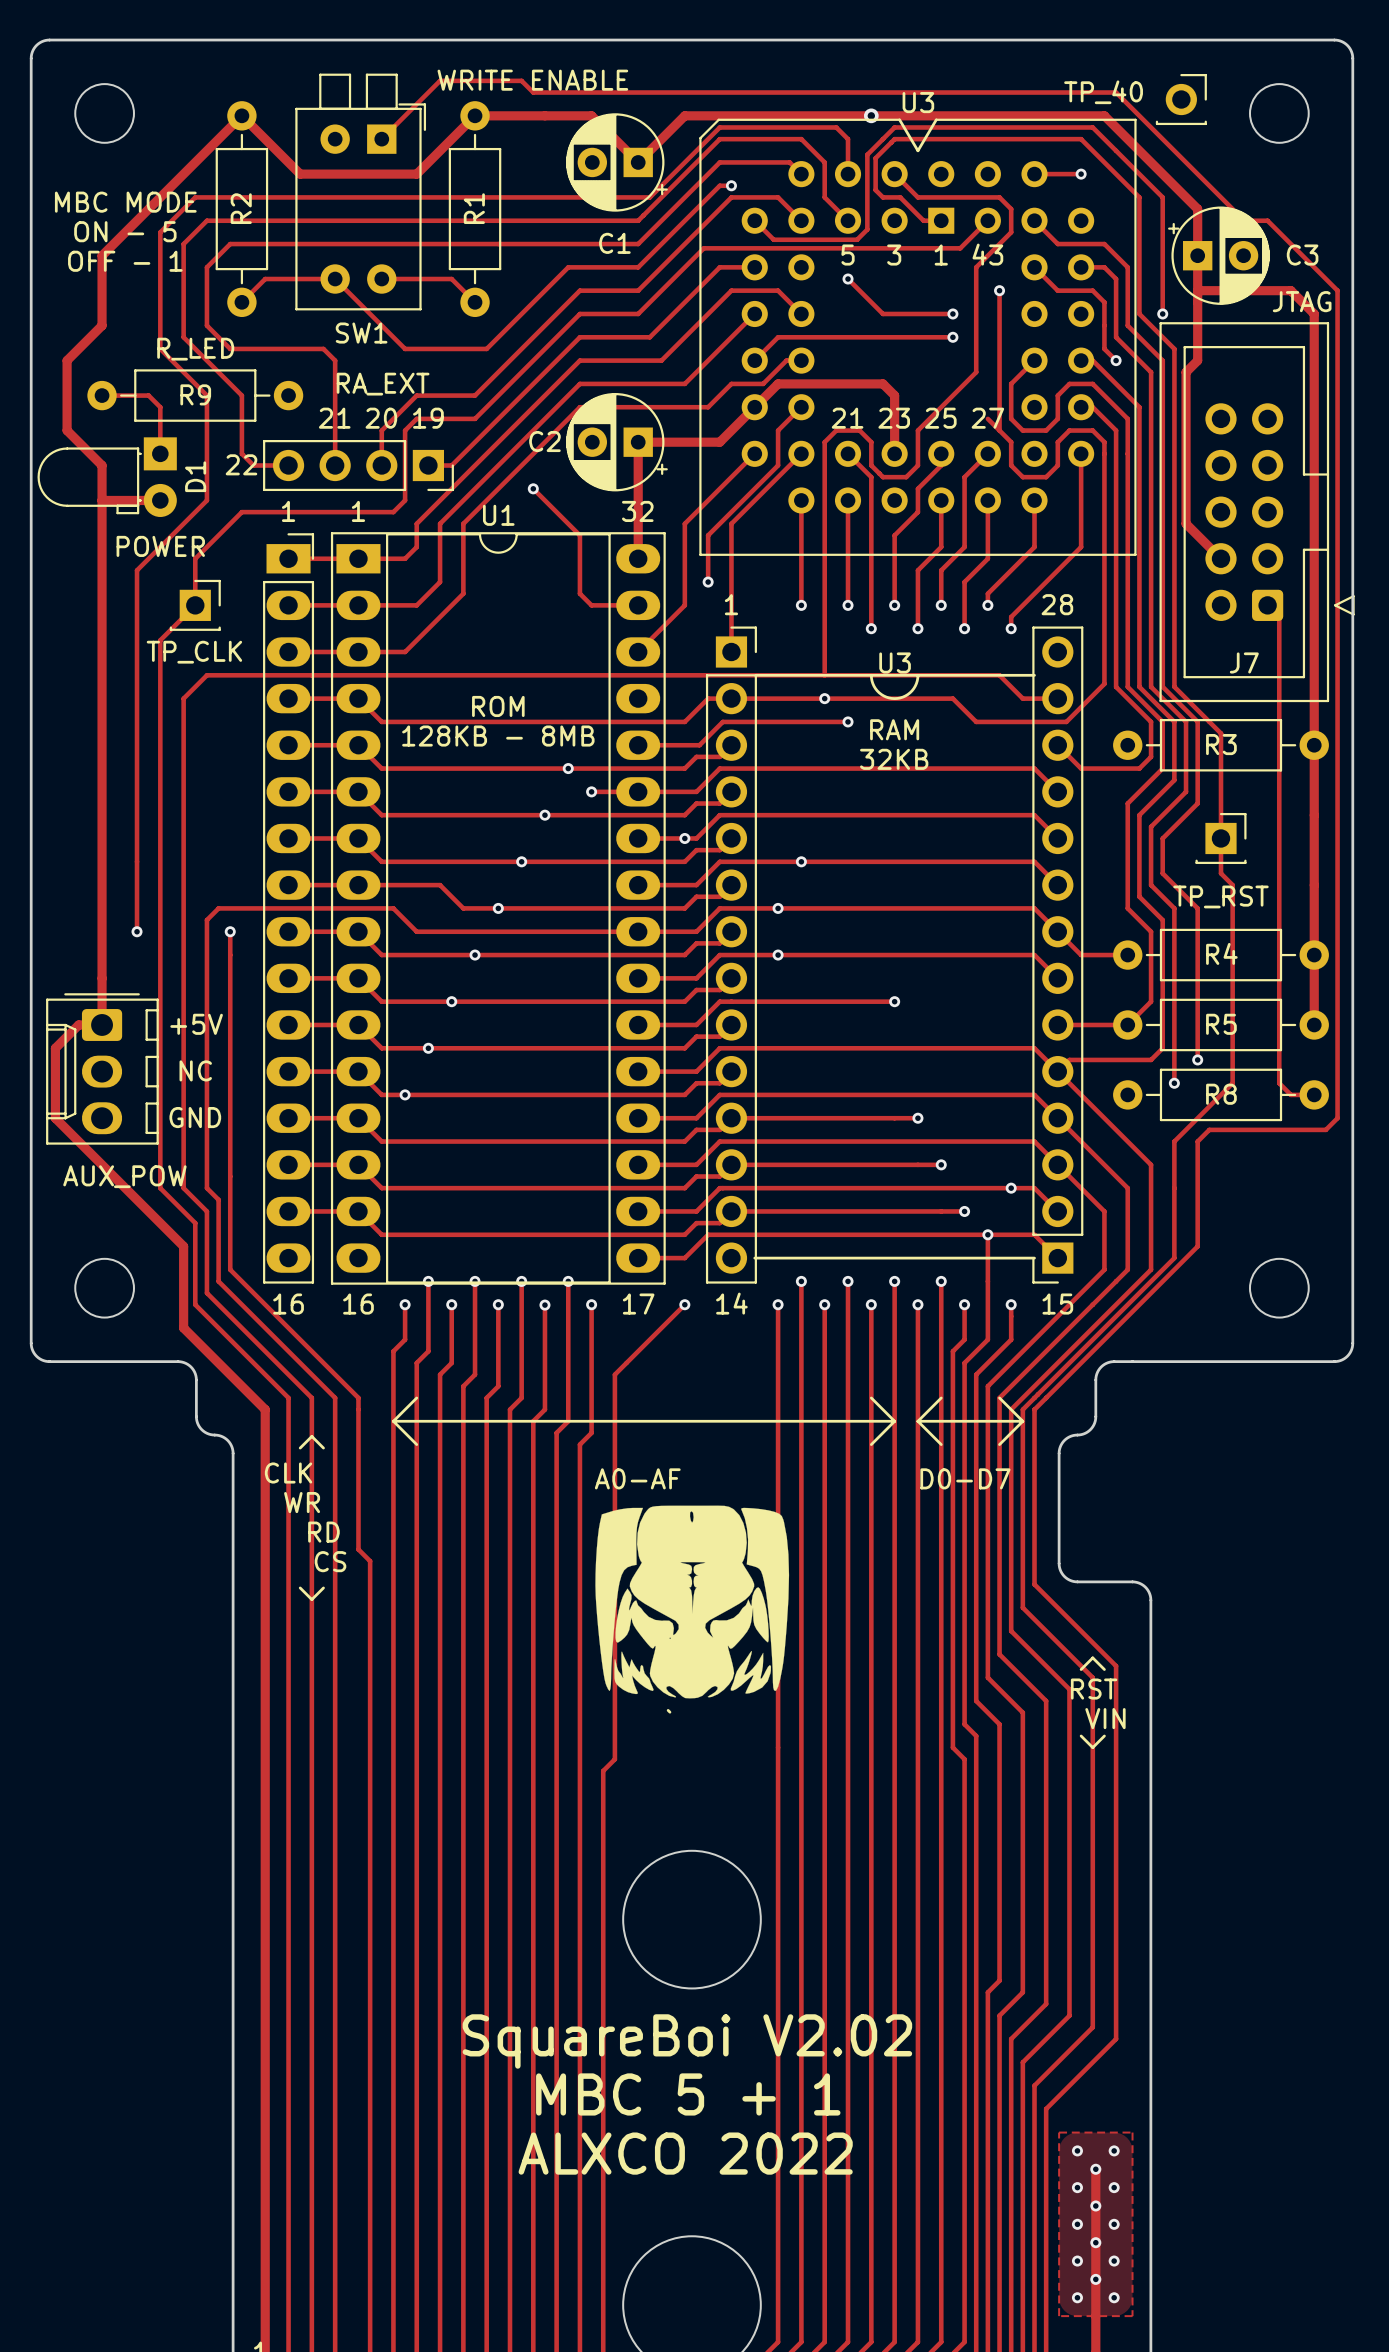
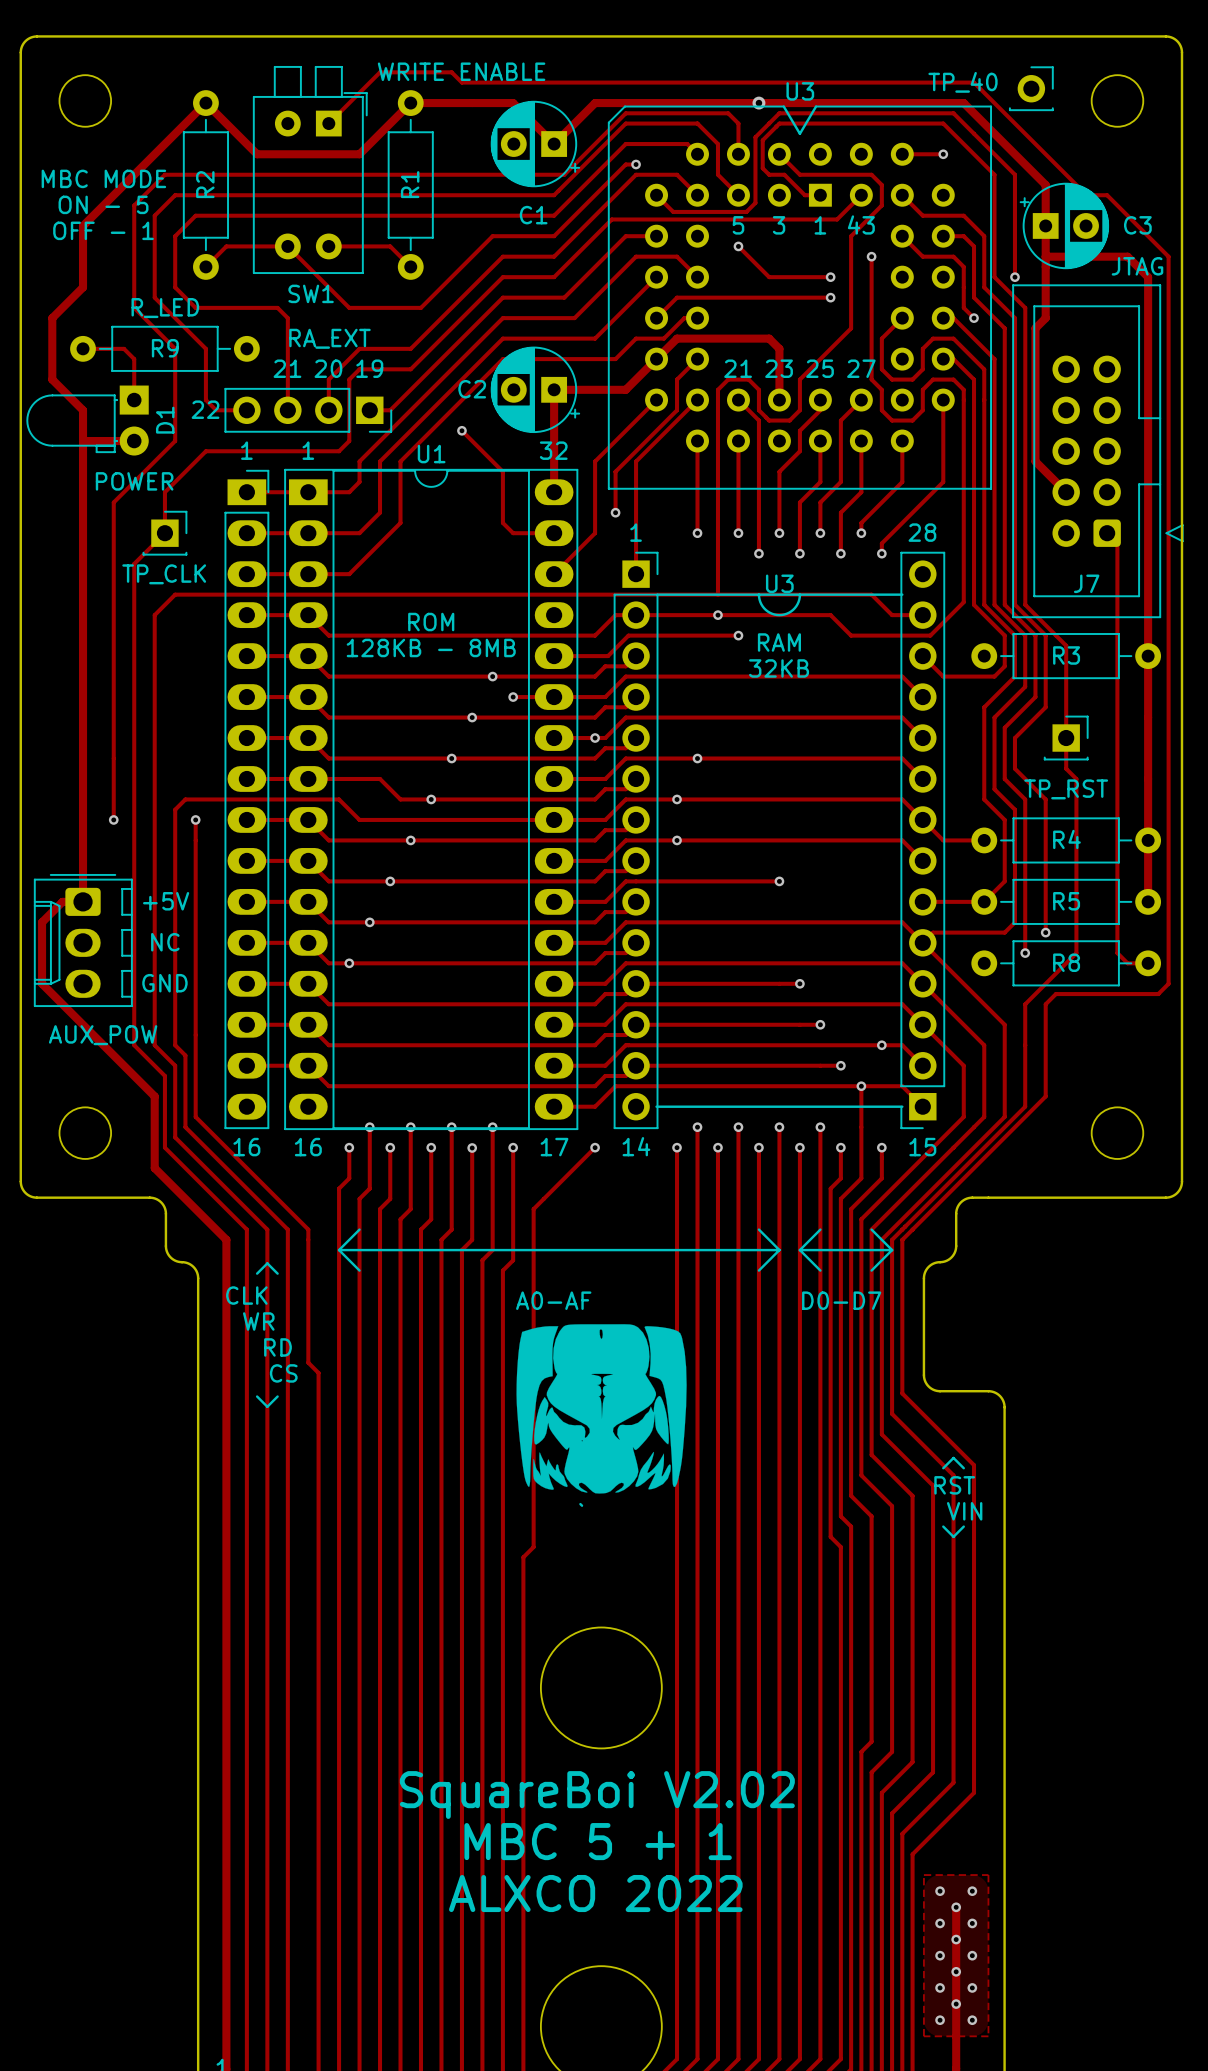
track: (987, 418) (999, 430) -> none

